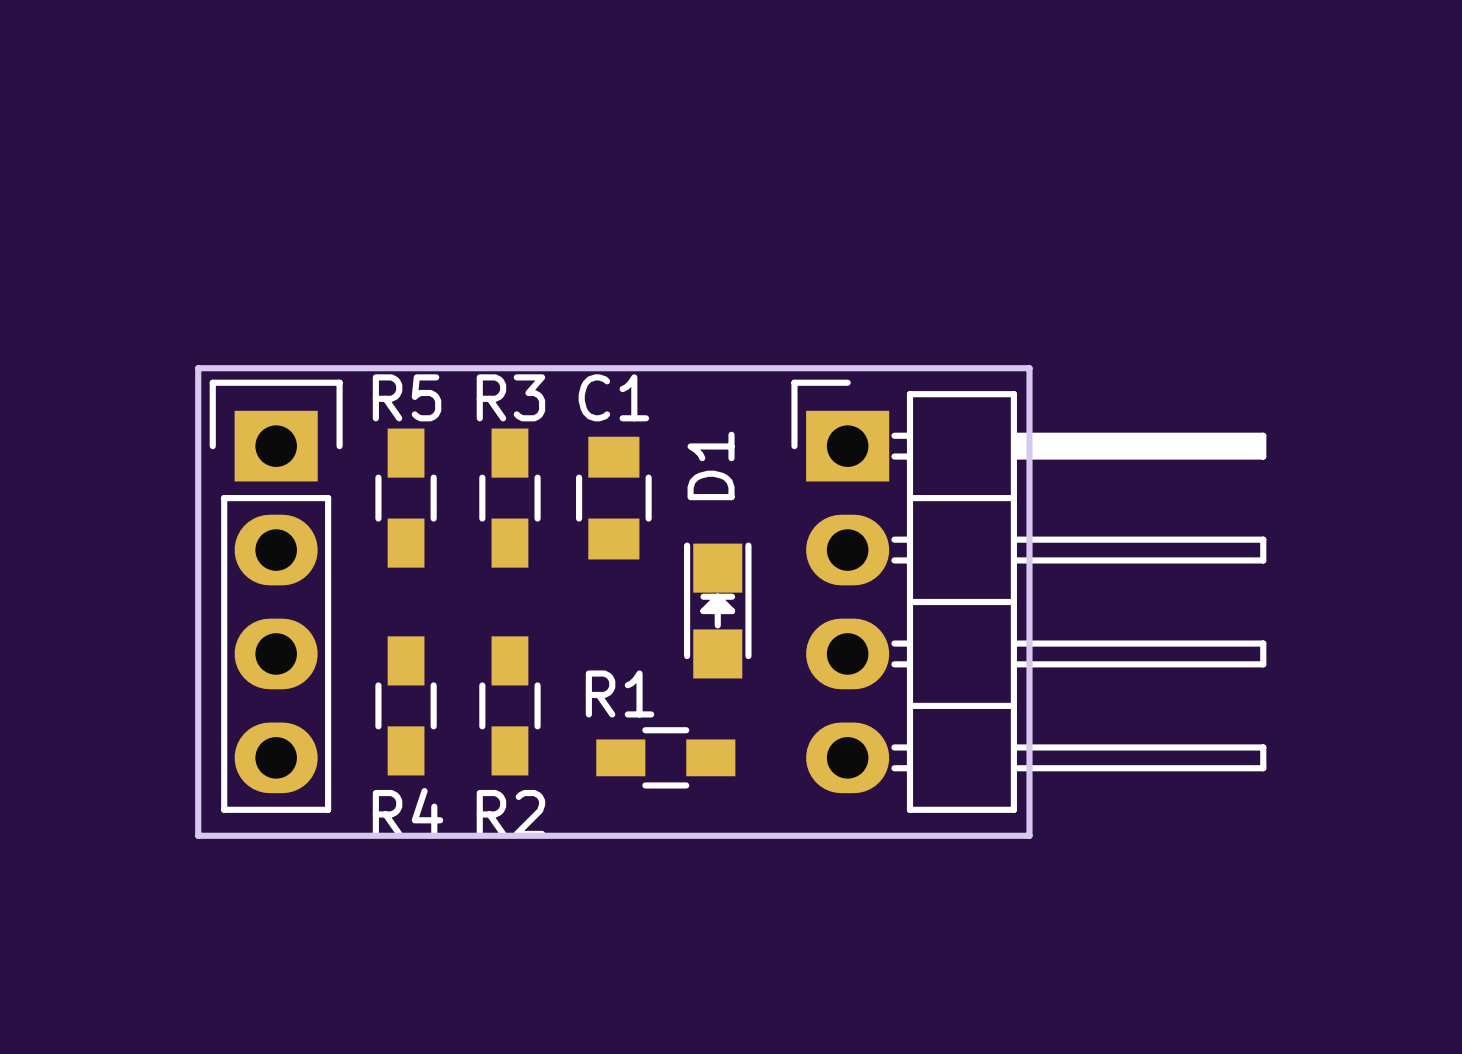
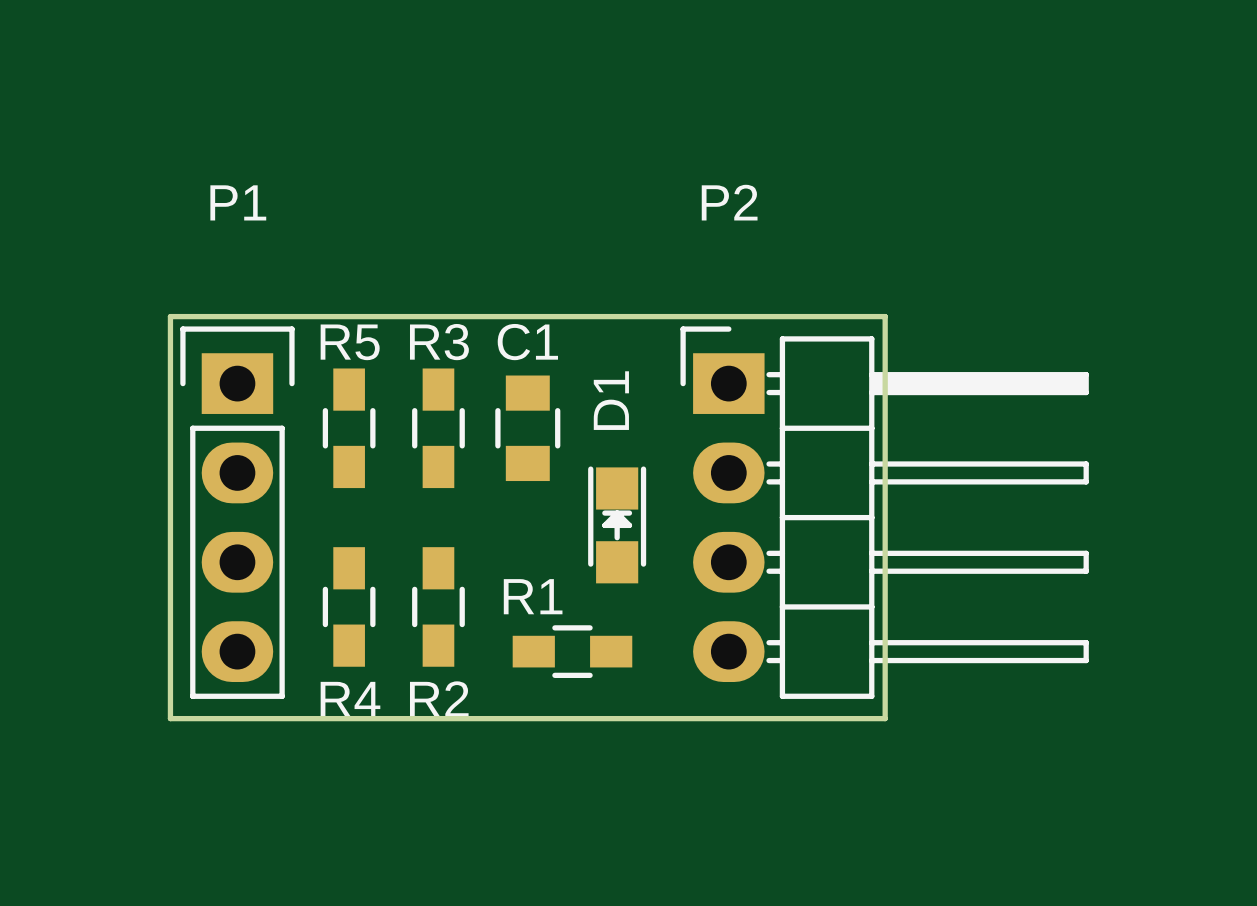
P1 name: none -> P1 (238, 202)
P2 name: none -> P2 (729, 202)

